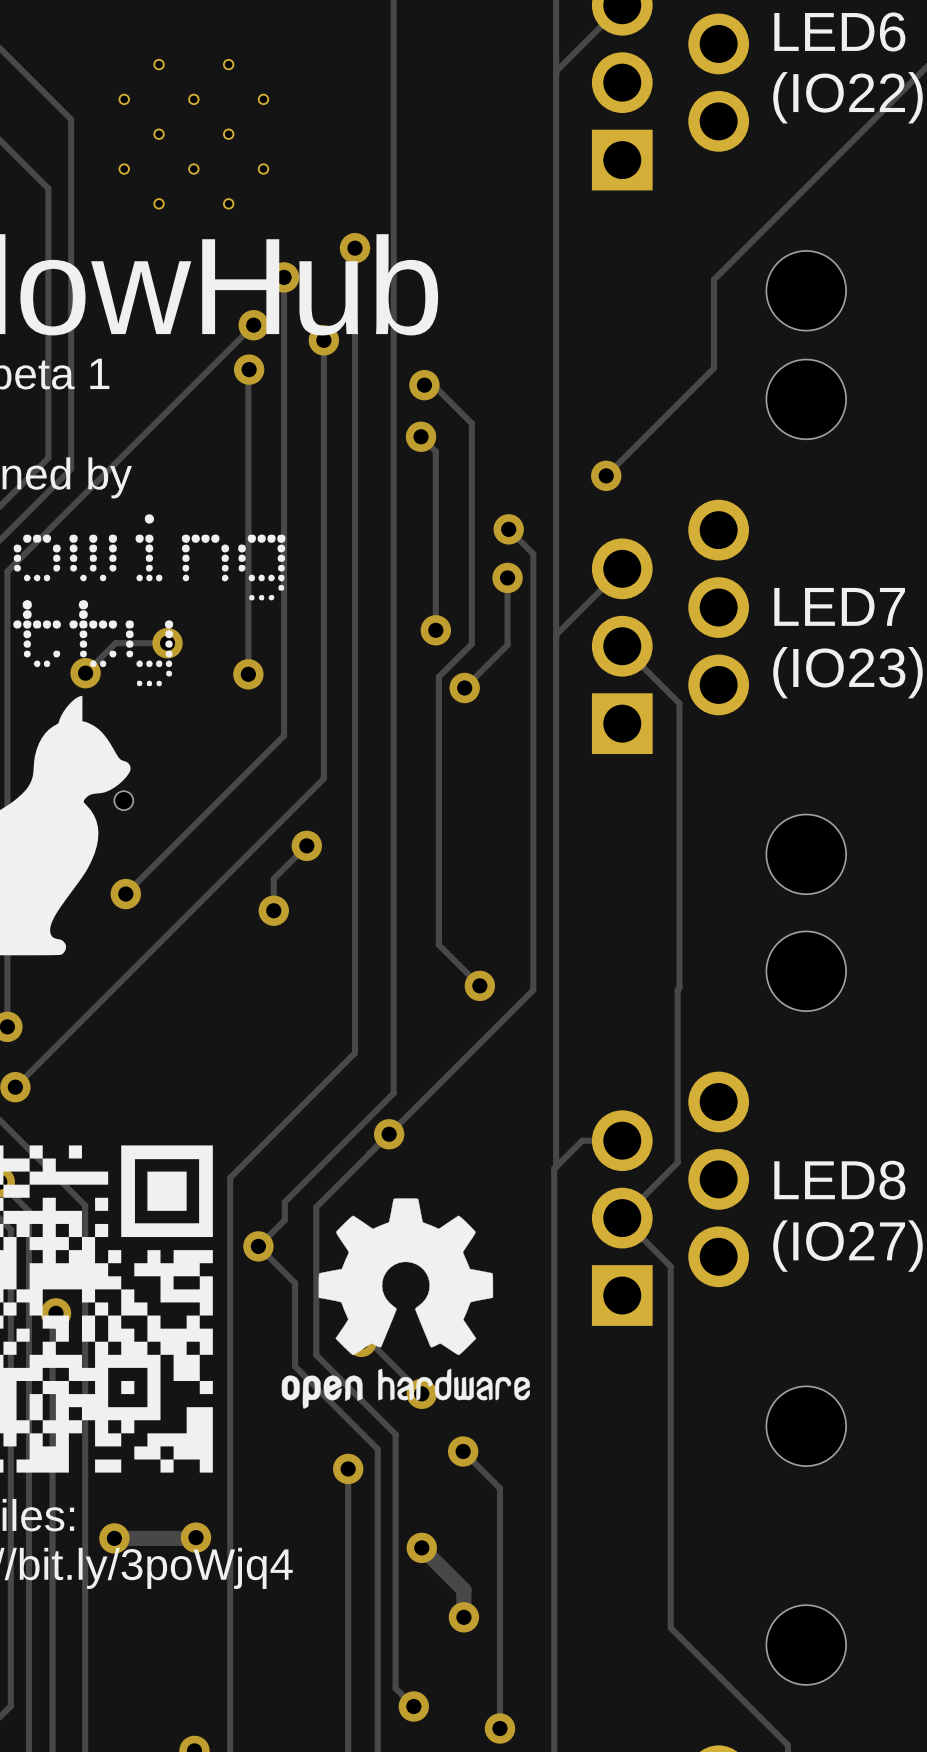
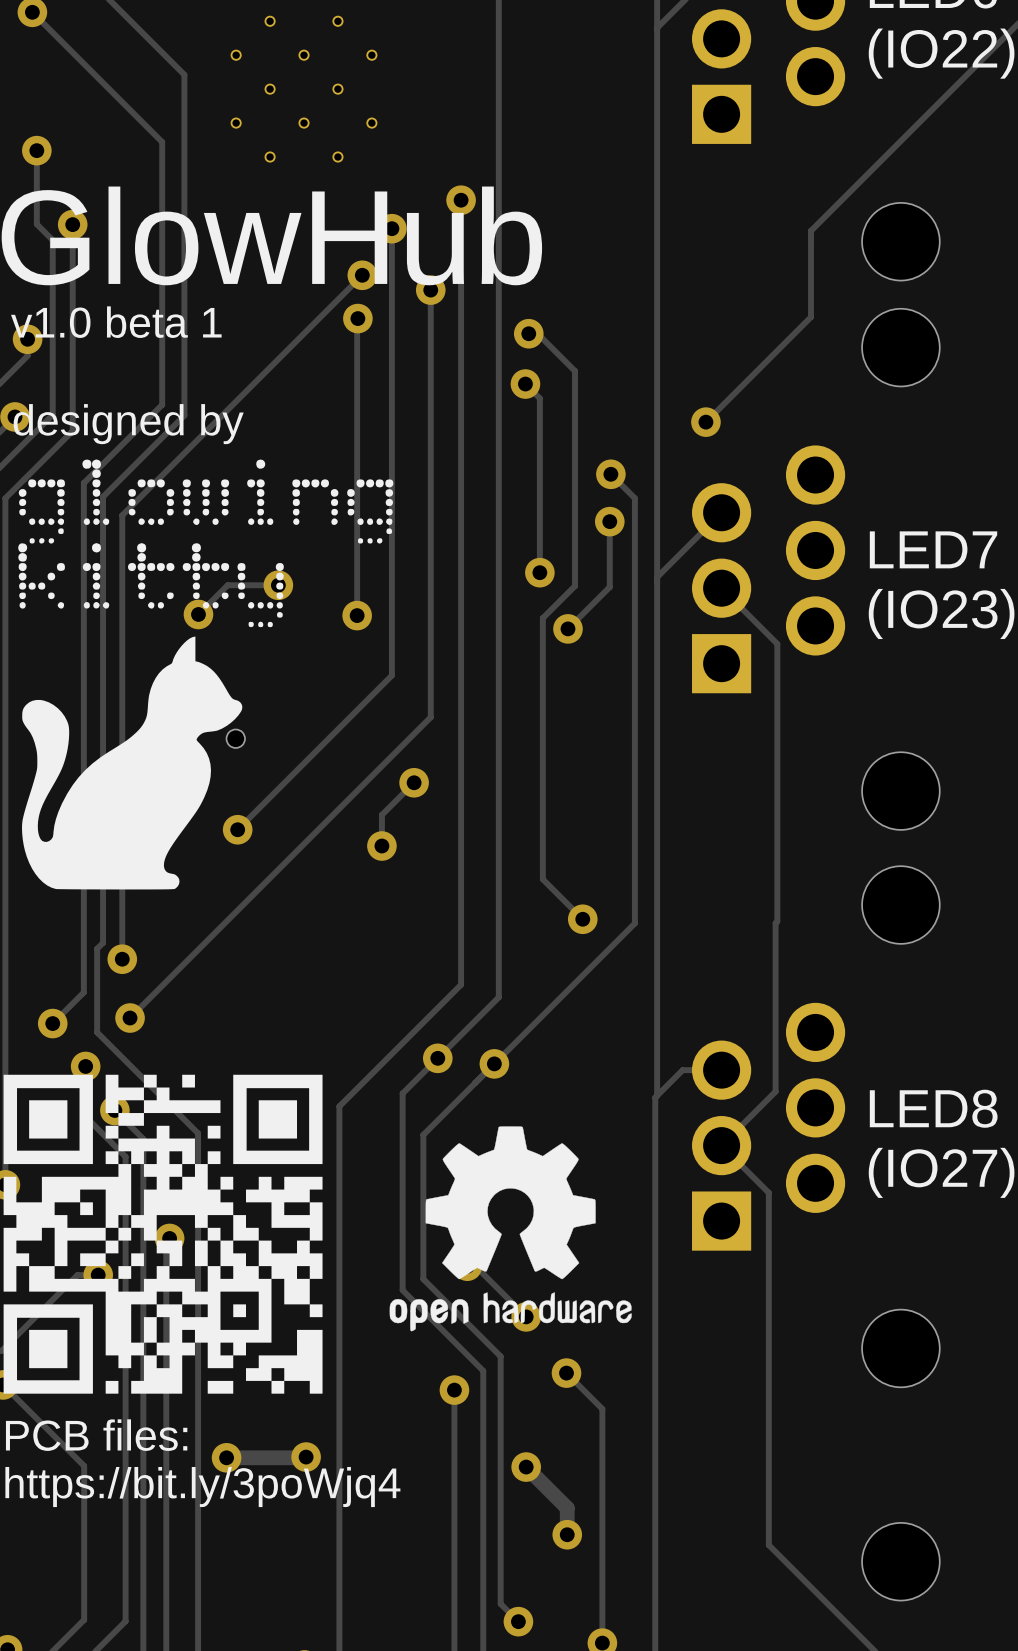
track: (393, 1065) (393, 1093) (284, 1202) (284, 1219) (258, 1246) (295, 1283) -> (498, 997) (402, 1093) (402, 1208)
via position: (258, 1246) -> (437, 1058)

